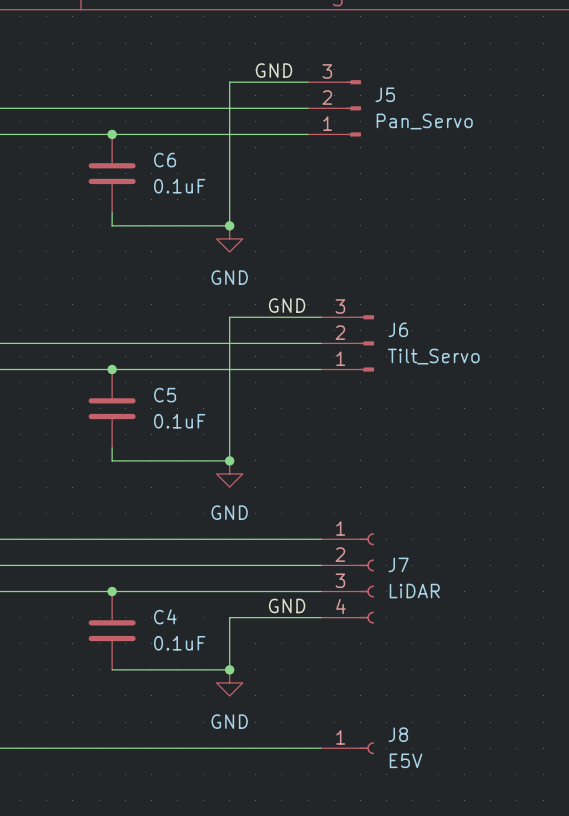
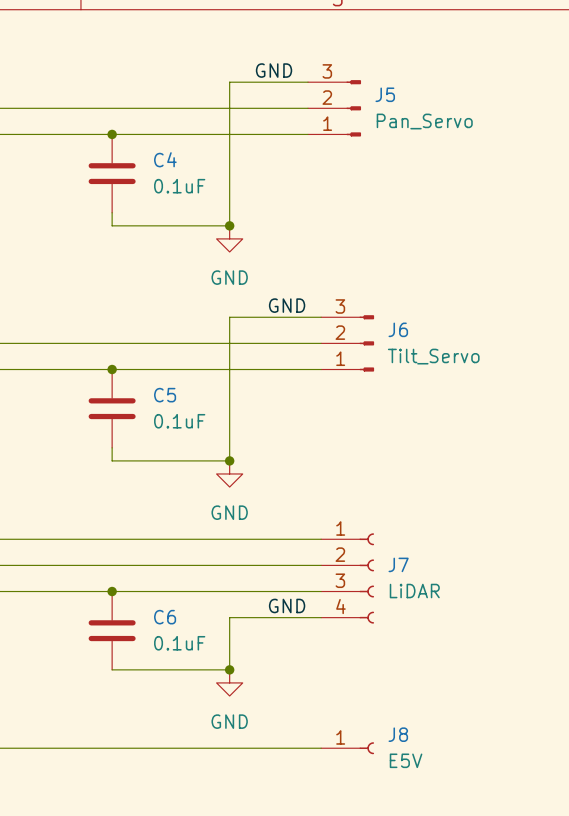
C6 name: C6 (165, 160) -> C4 (165, 159)
C4 name: C4 (165, 616) -> C6 (165, 617)

